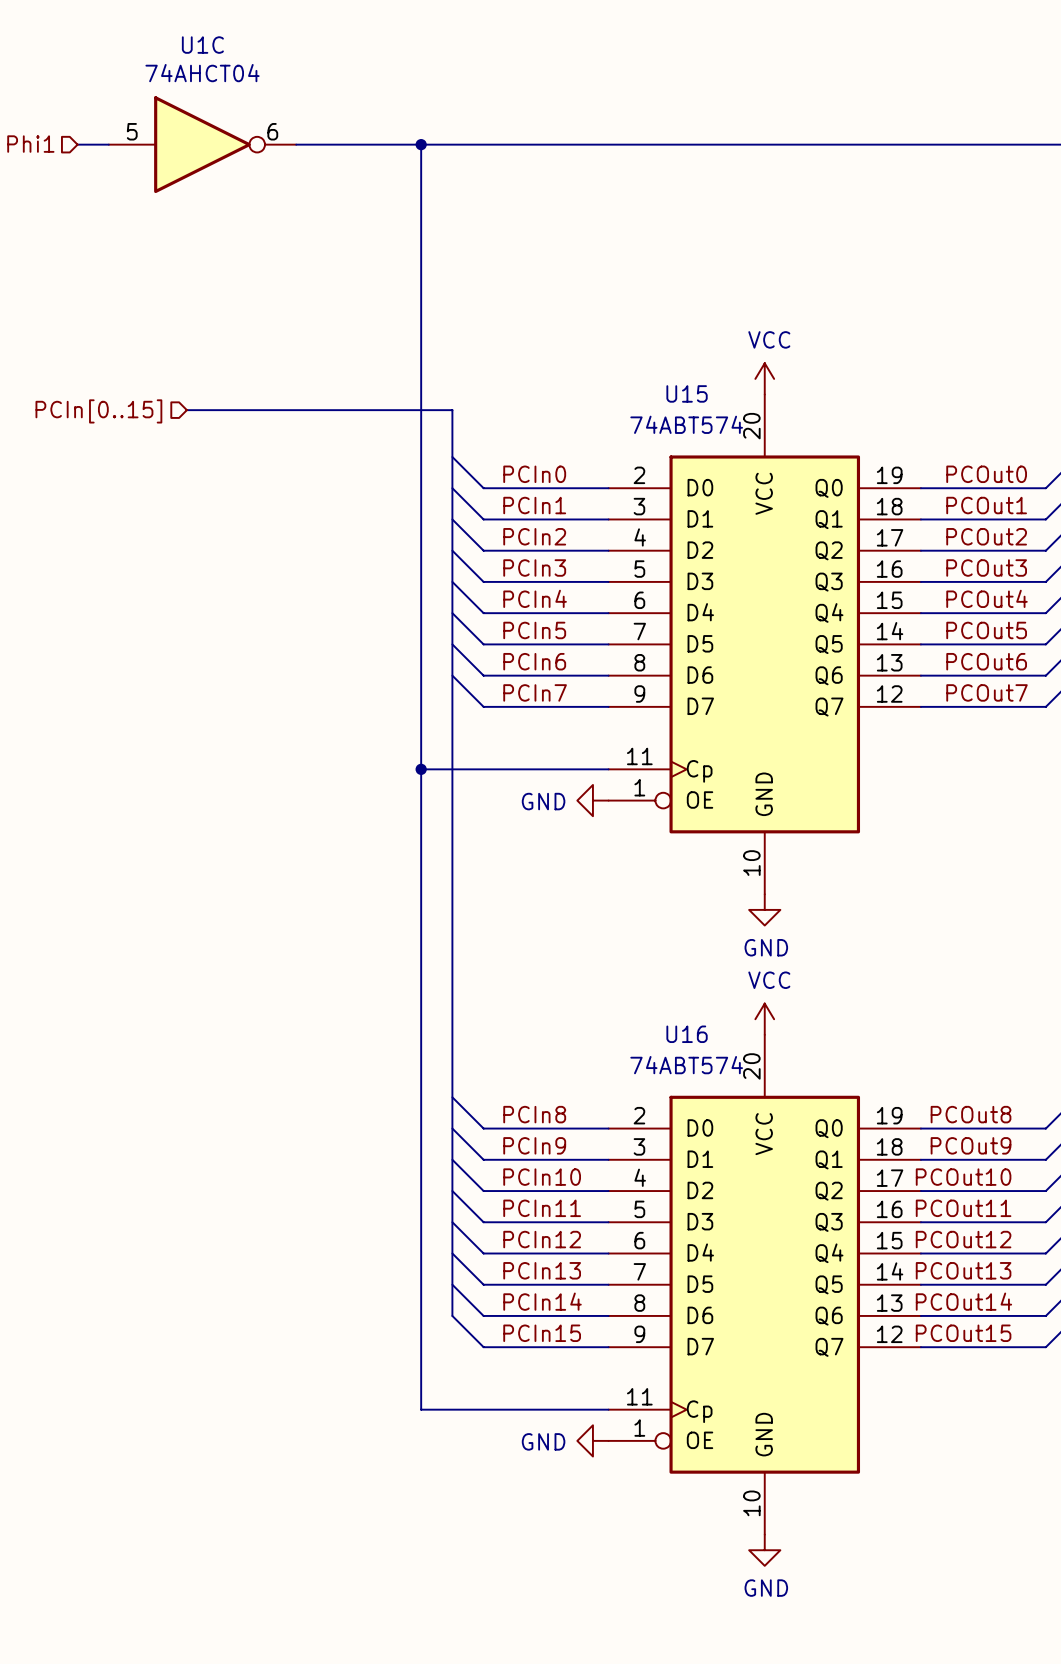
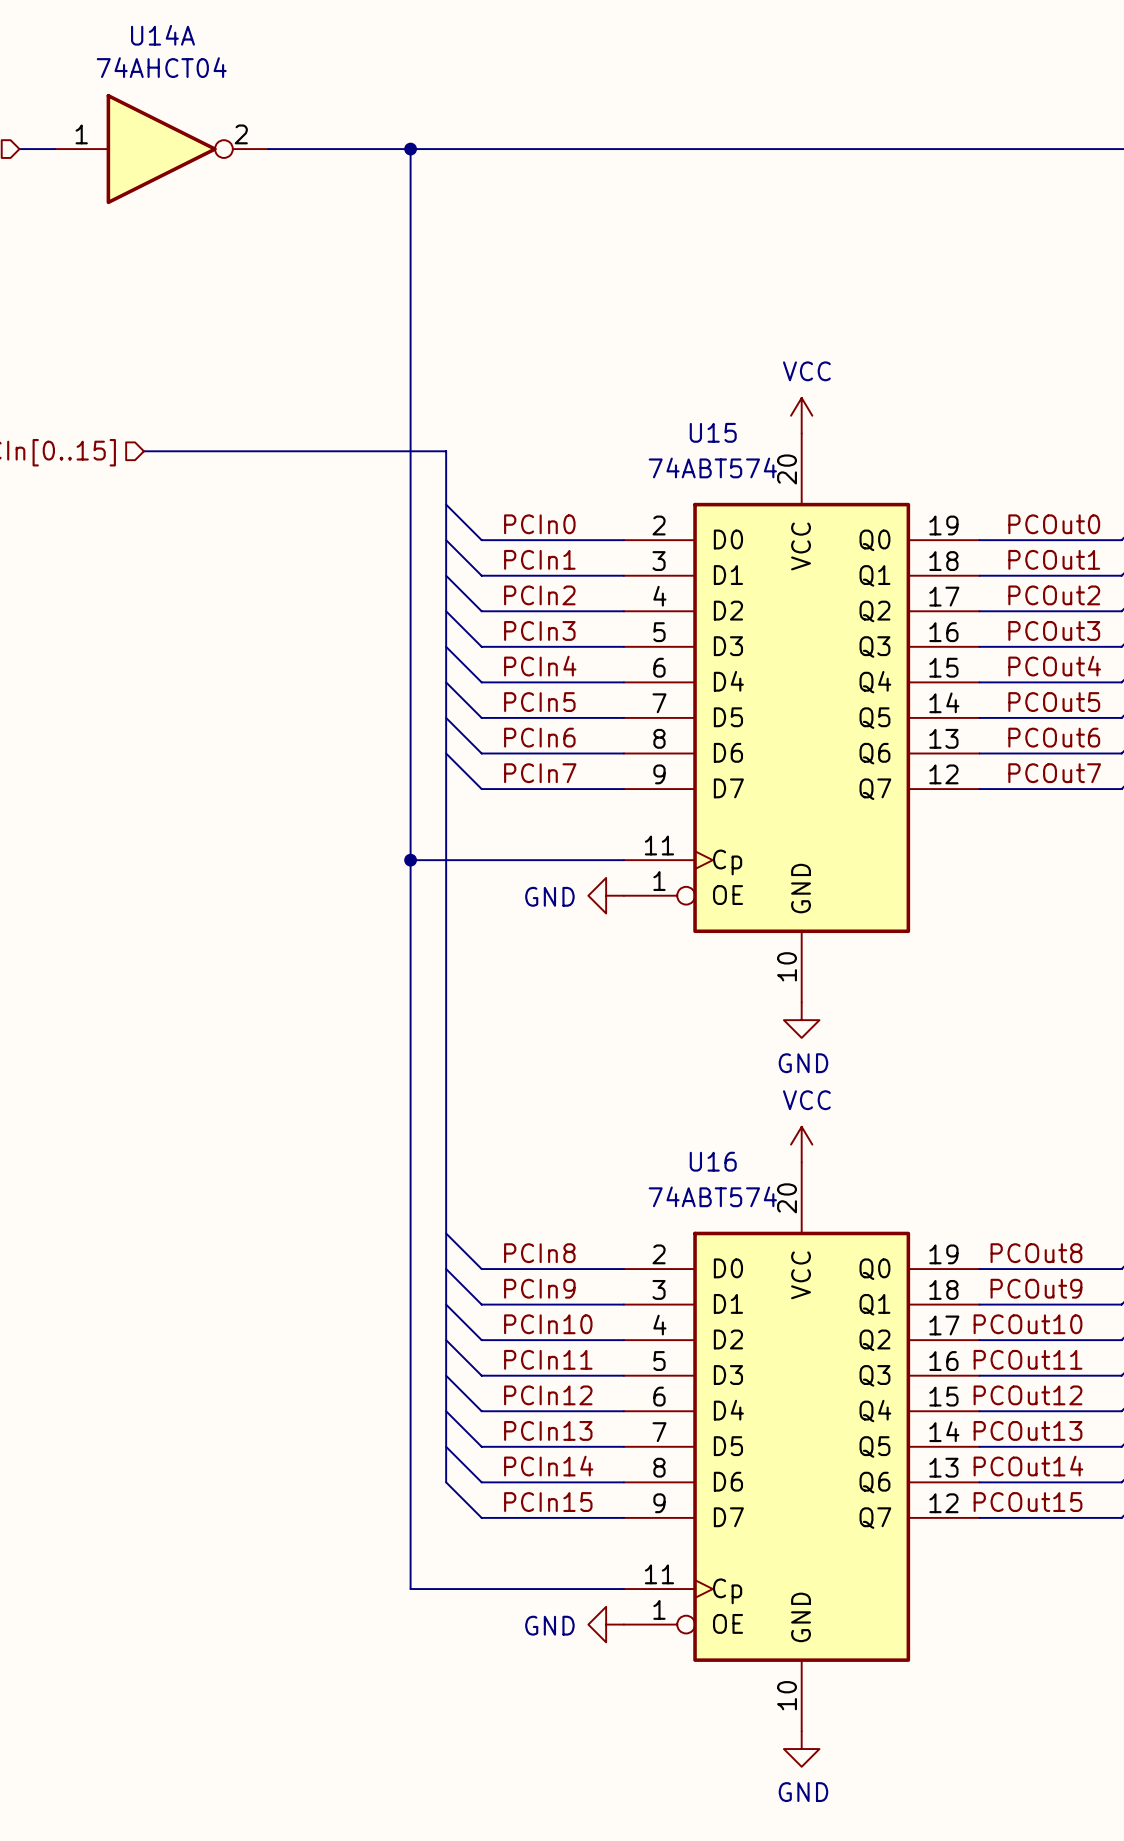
U1C name: U1C (202, 45) -> U14A (162, 35)
U1C pin number: 5 (132, 131) -> 1 (81, 134)
U1C pin number: 6 (272, 131) -> 2 (241, 134)

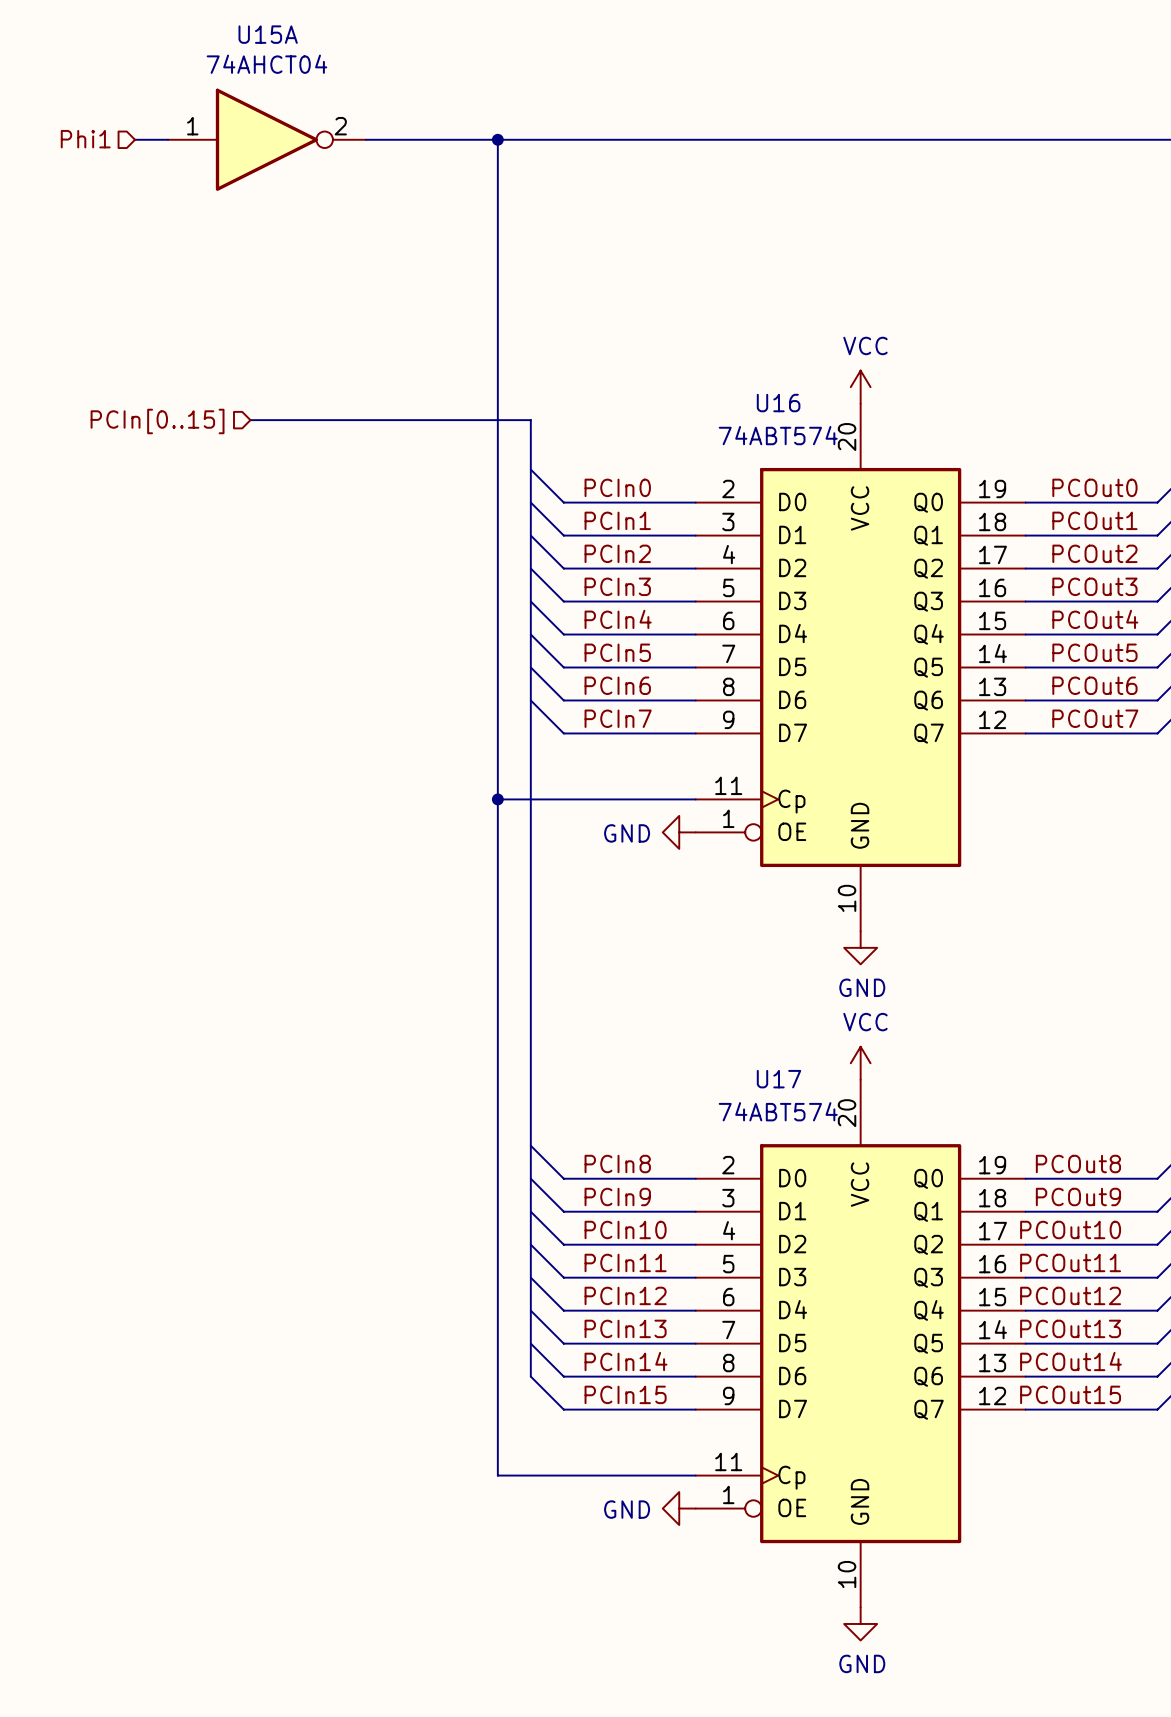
U14A name: U14A (162, 35) -> U15A (268, 34)
U15 name: U15 (713, 432) -> U16 (778, 403)
U16 name: U16 (713, 1161) -> U17 (778, 1079)

